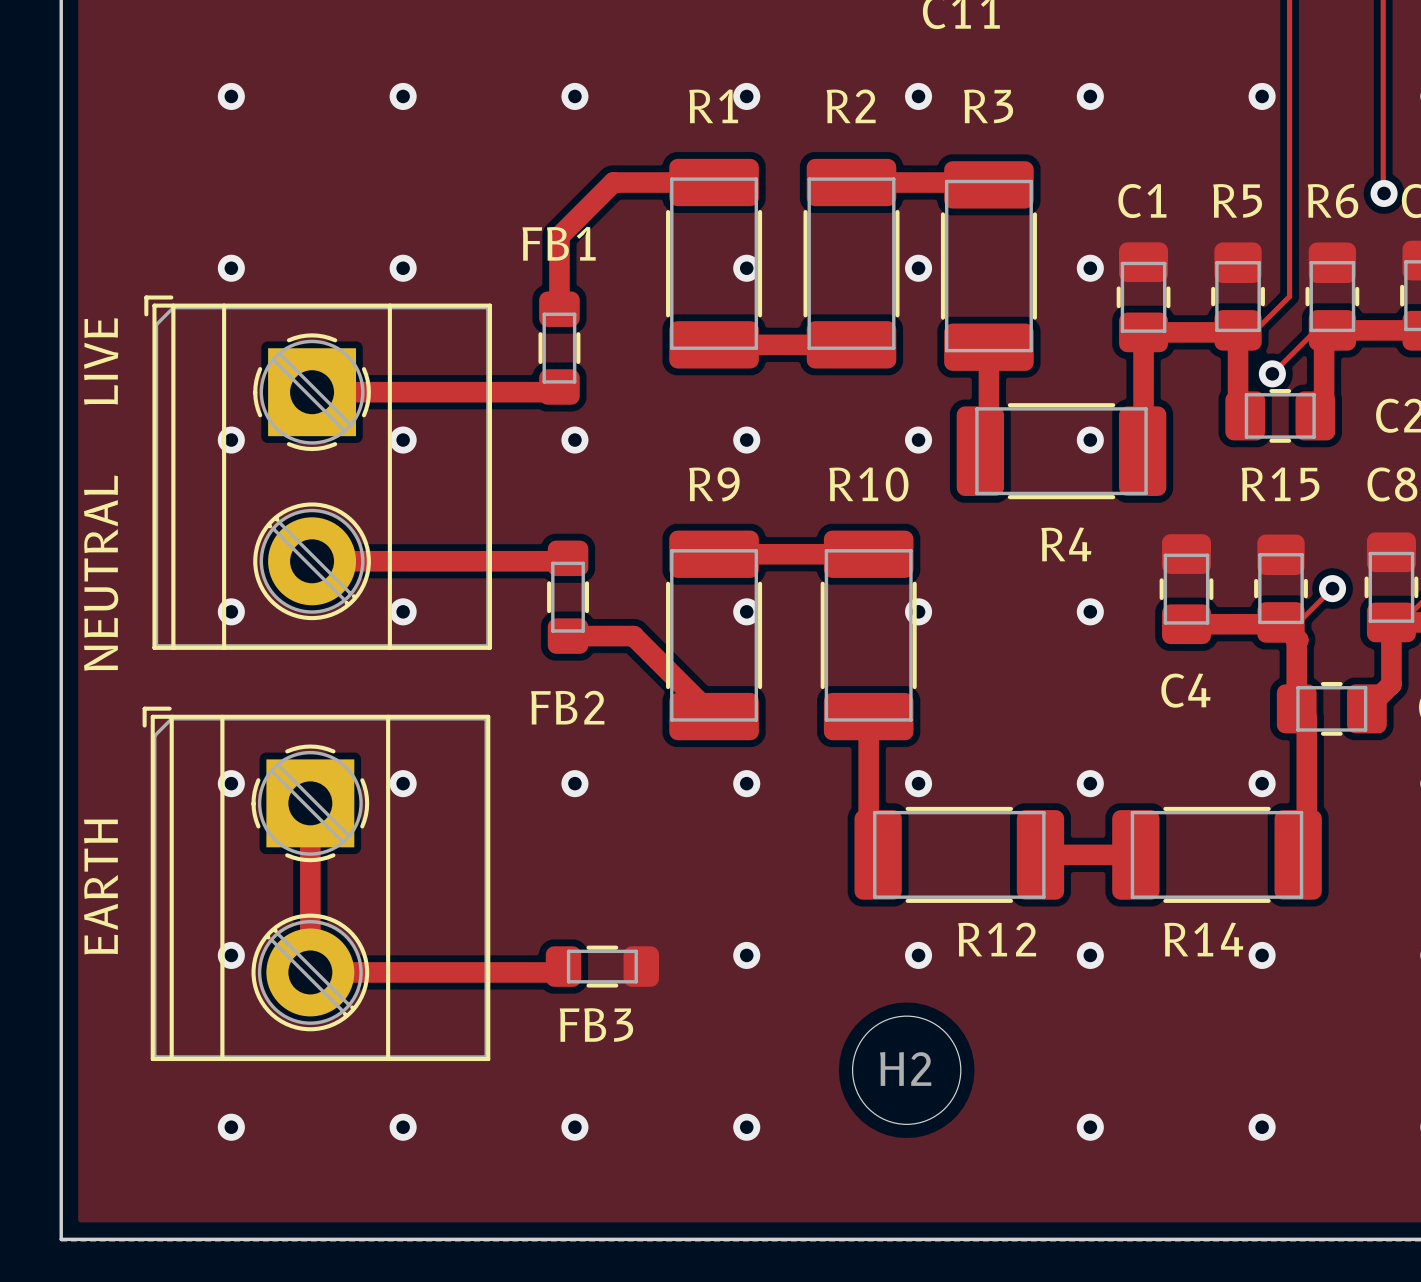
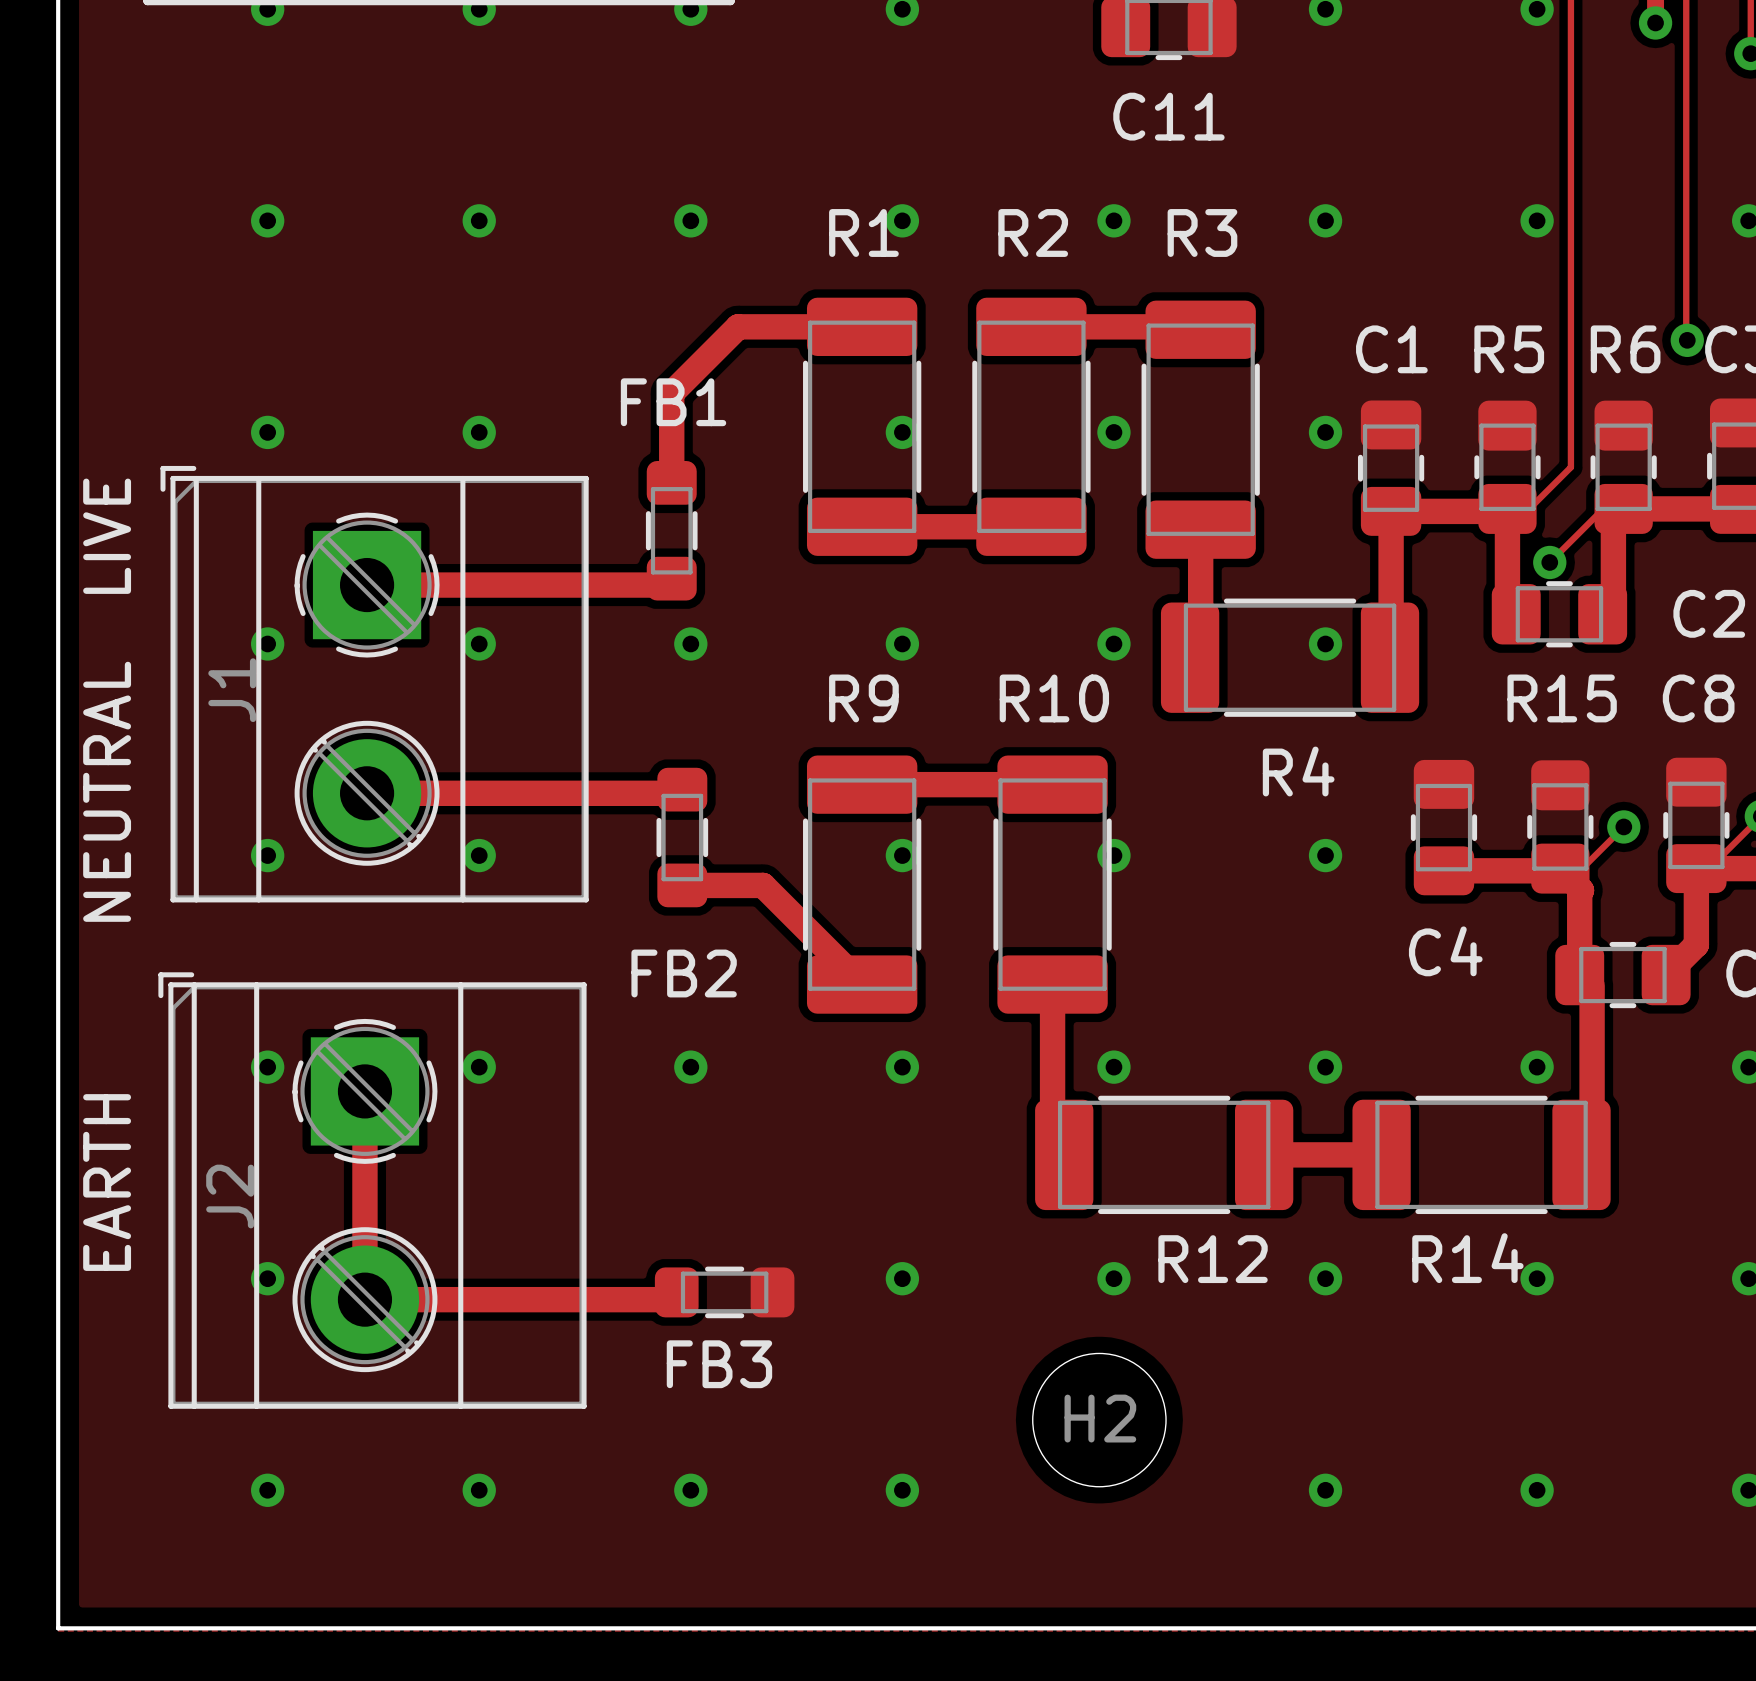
J1 name: none -> J1 (232, 690)
J2 name: none -> J2 (230, 1196)

